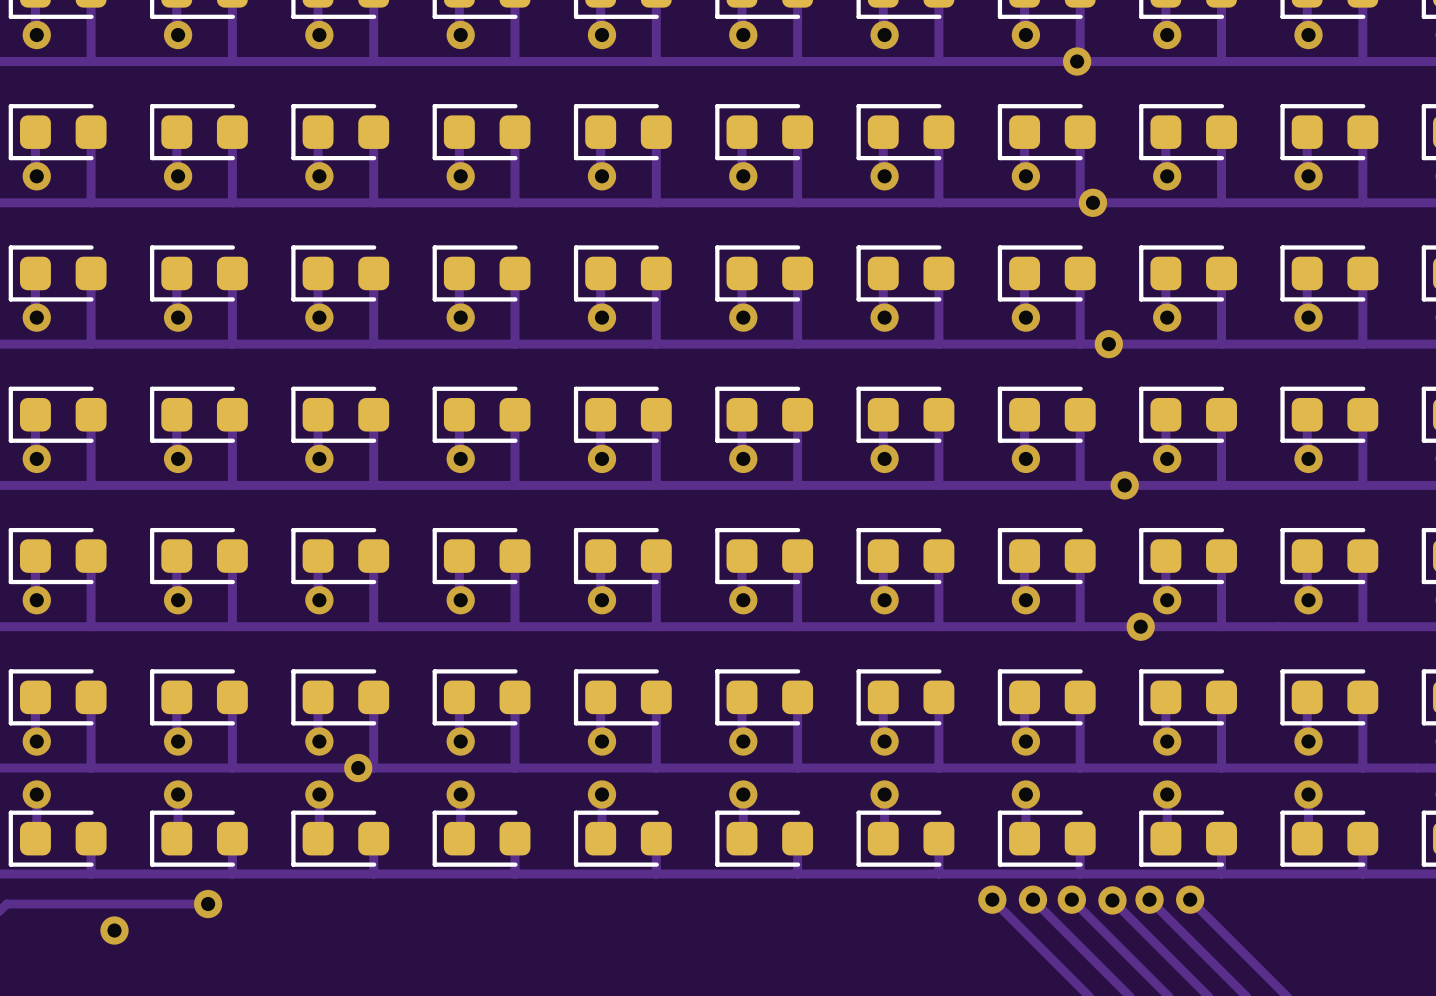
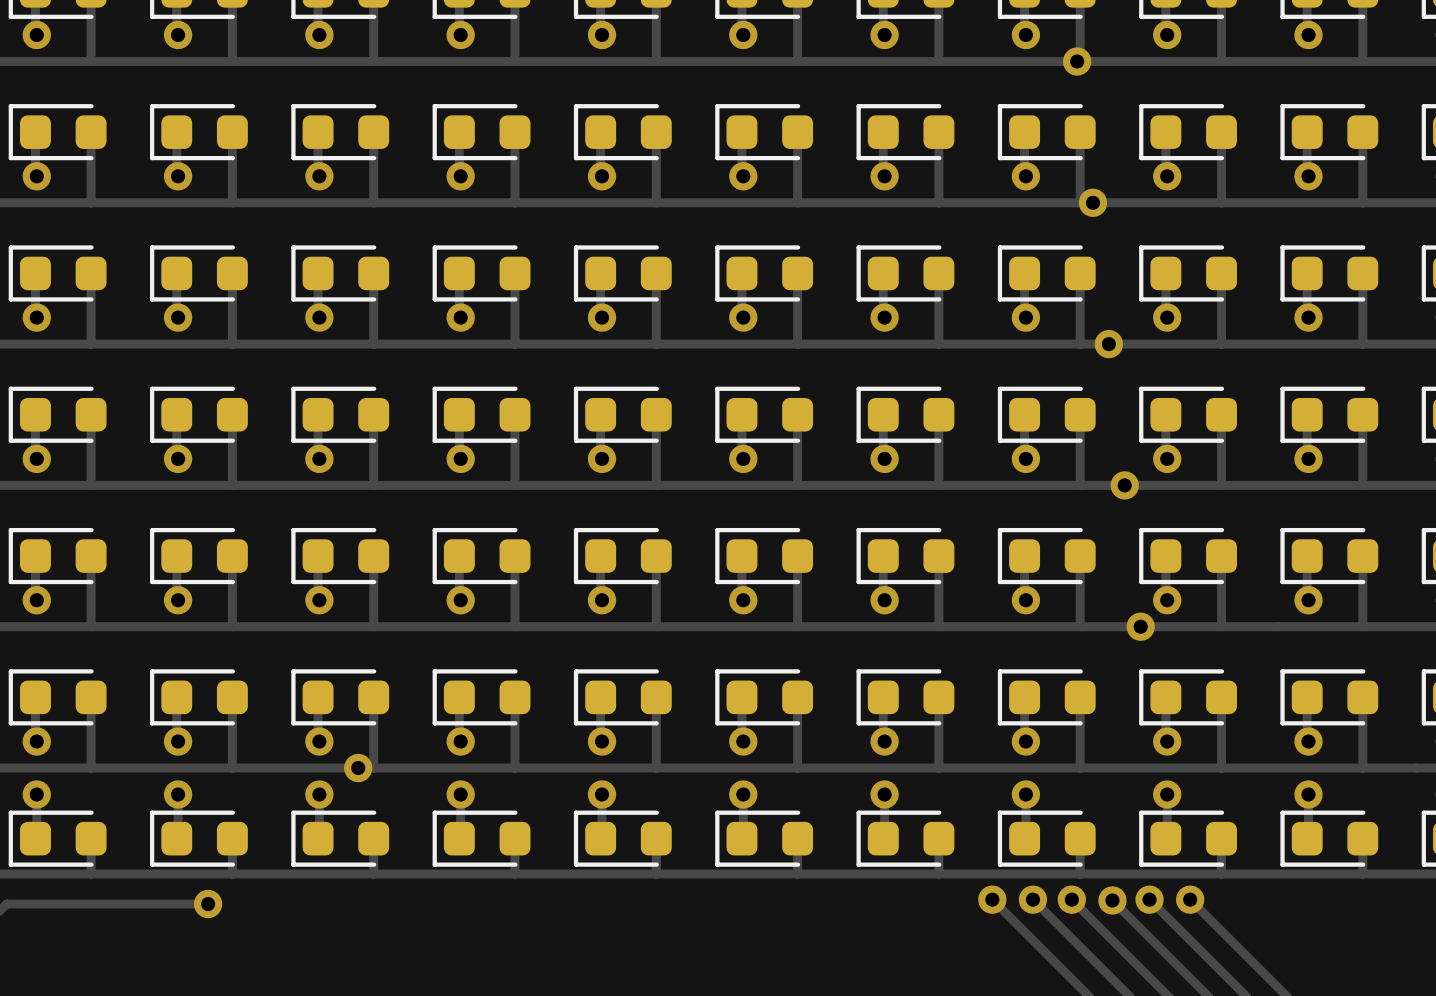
via: (114, 930) -> none

